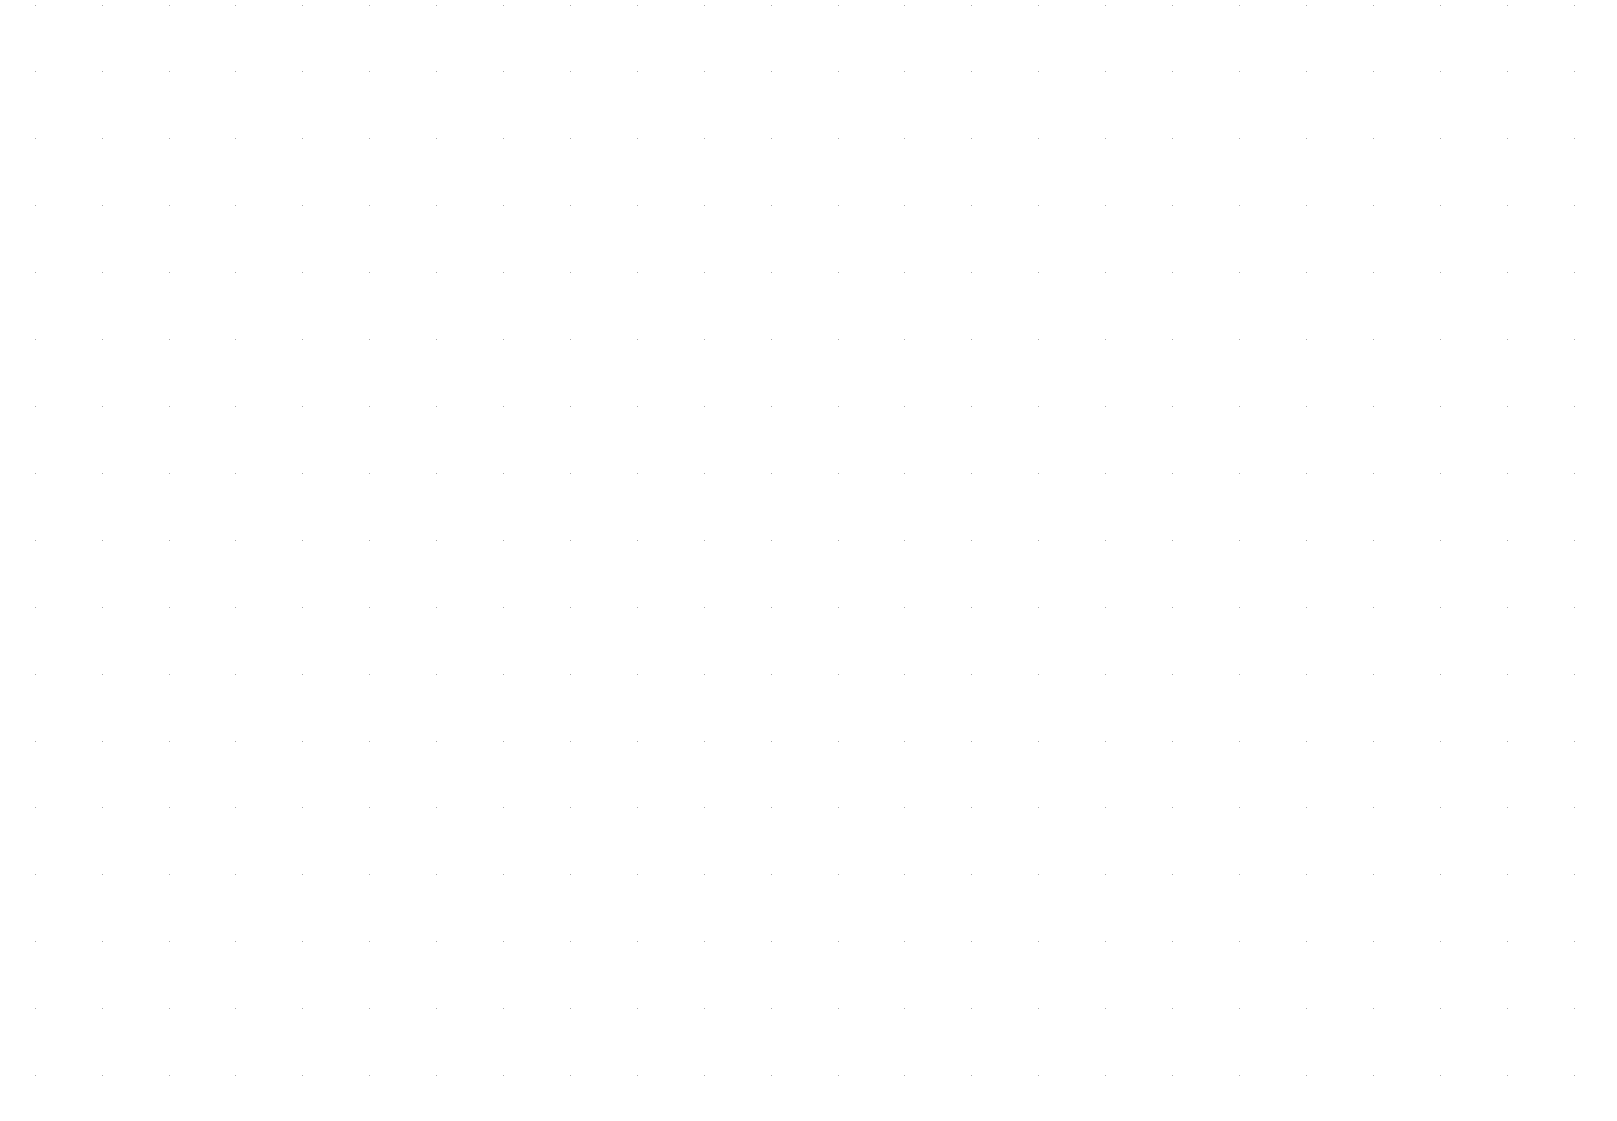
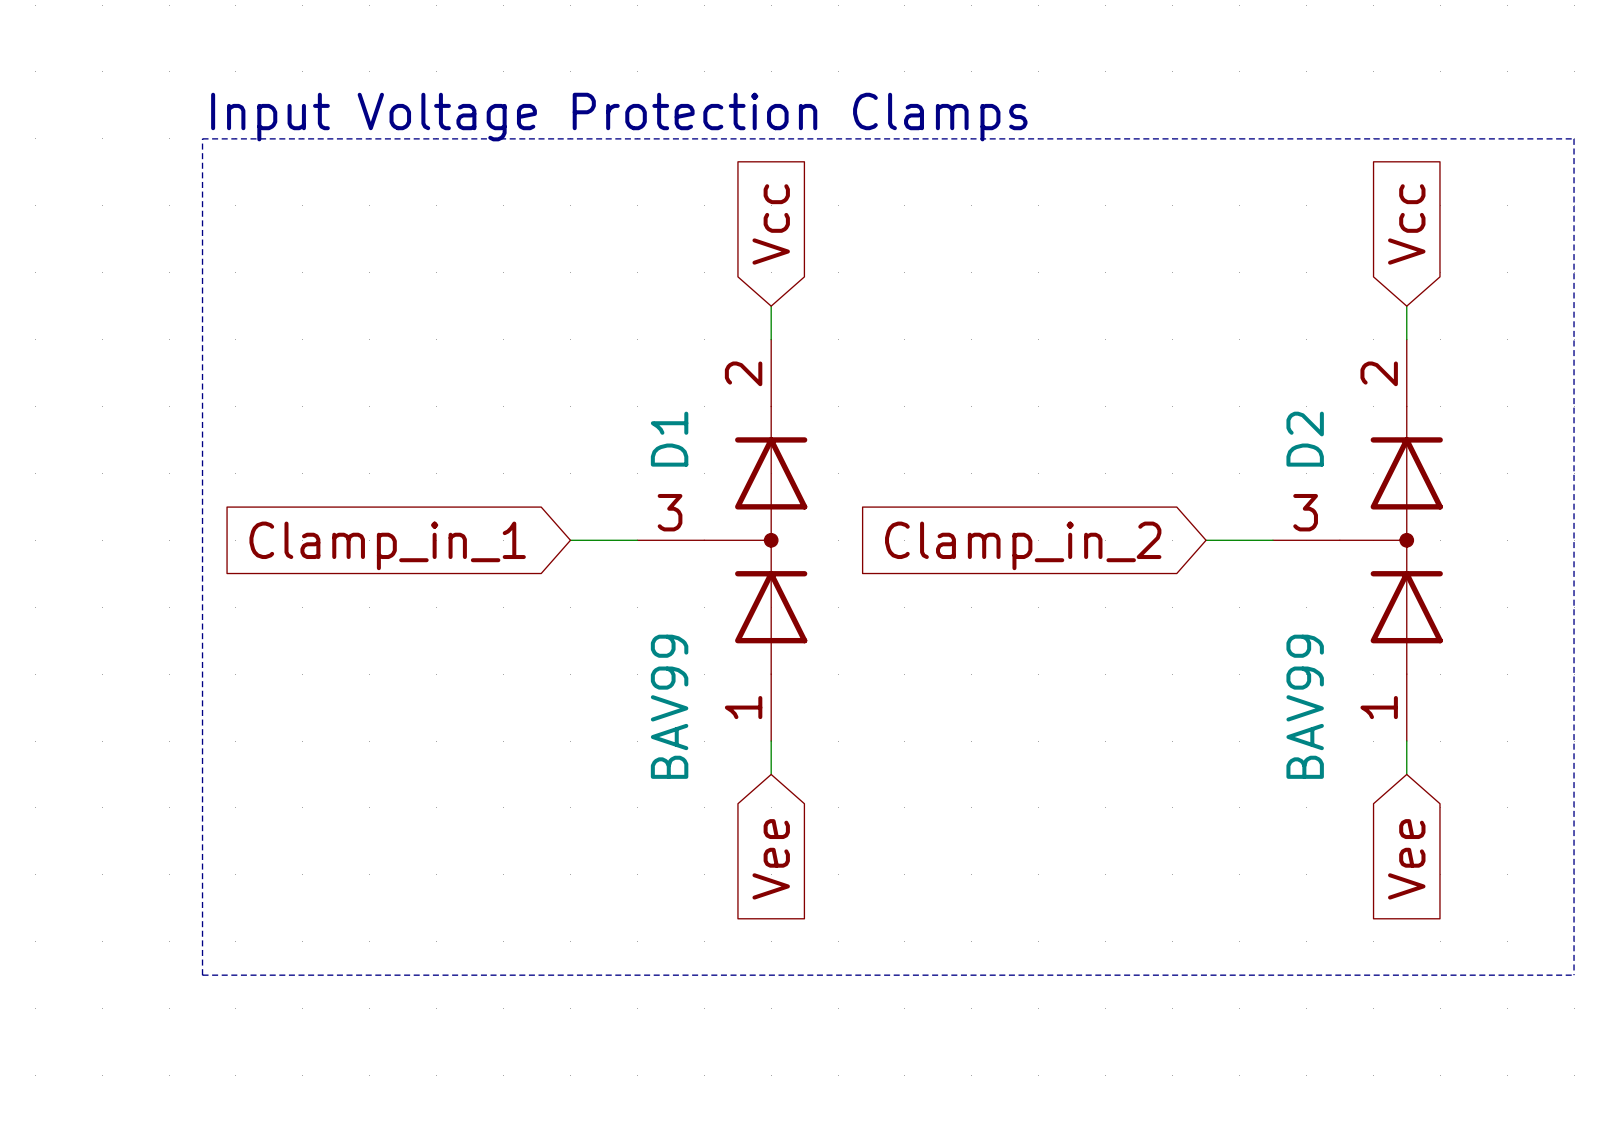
text: none -> Input Voltage Protection Clamps (619, 117)
line: none -> (202, 138) (1574, 138) (1574, 975) (202, 975) (202, 138)
global label: none -> Vcc (771, 224)
global label: none -> Vcc (1406, 224)
wire: none -> (771, 306) (771, 339)
wire: none -> (1406, 306) (1406, 339)
wire: none -> (570, 540) (637, 540)
D1: none -> BAV99 (722, 540)
wire: none -> (1206, 540) (1272, 540)
D2: none -> BAV99 (1357, 540)
global label: none -> Clamp_in_1 (387, 545)
global label: none -> Clamp_in_2 (1023, 545)
wire: none -> (771, 741) (771, 774)
wire: none -> (1406, 741) (1406, 774)
global label: none -> Vee (771, 859)
global label: none -> Vee (1406, 859)

